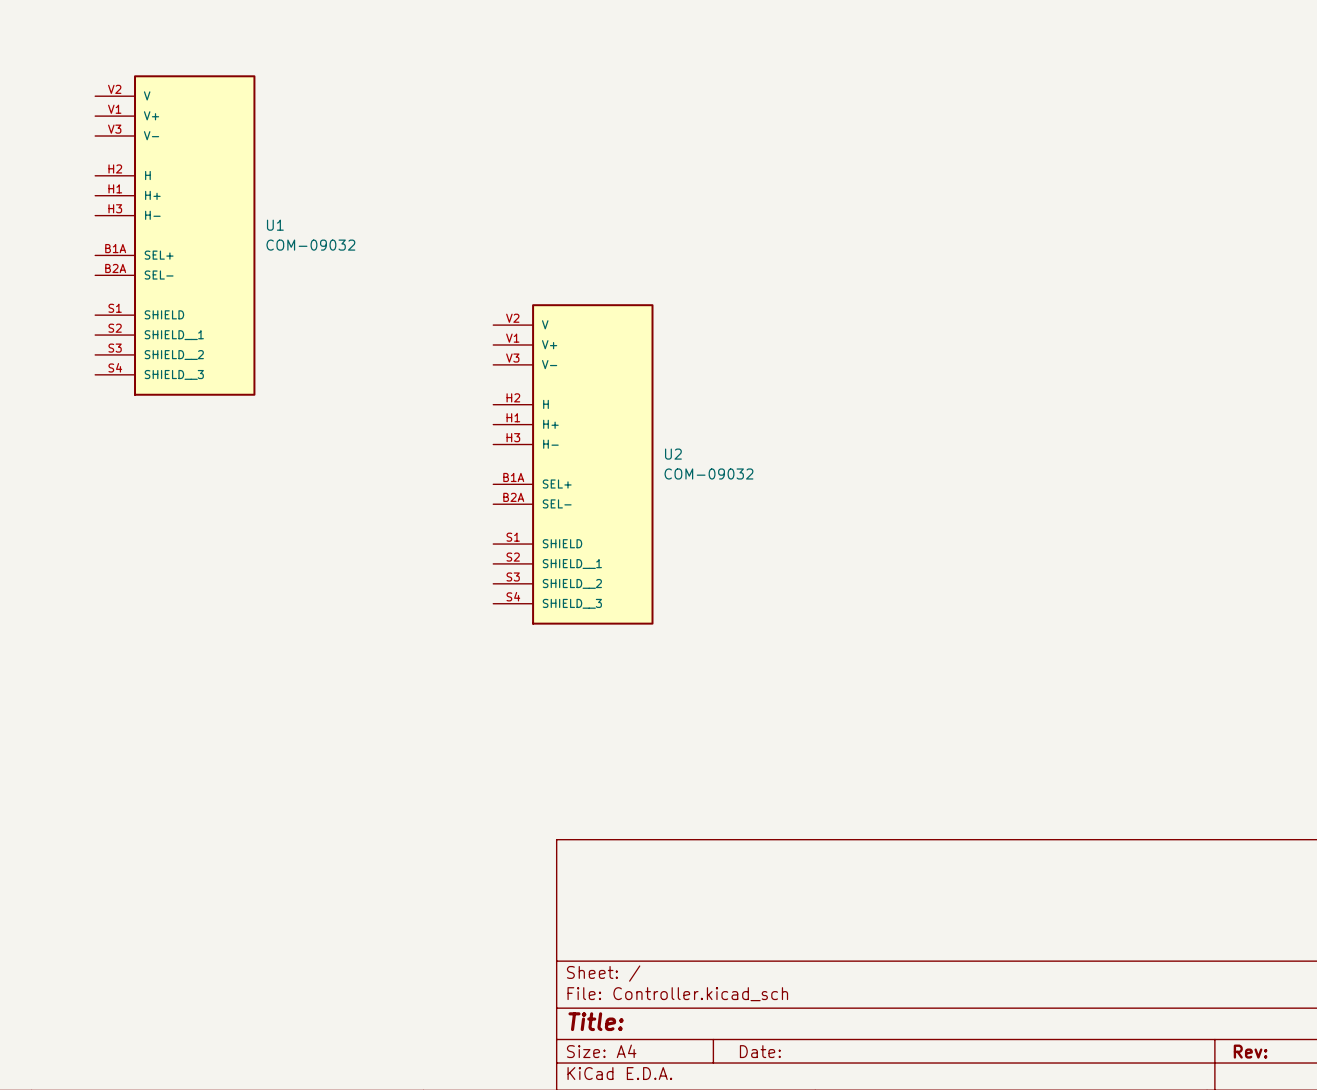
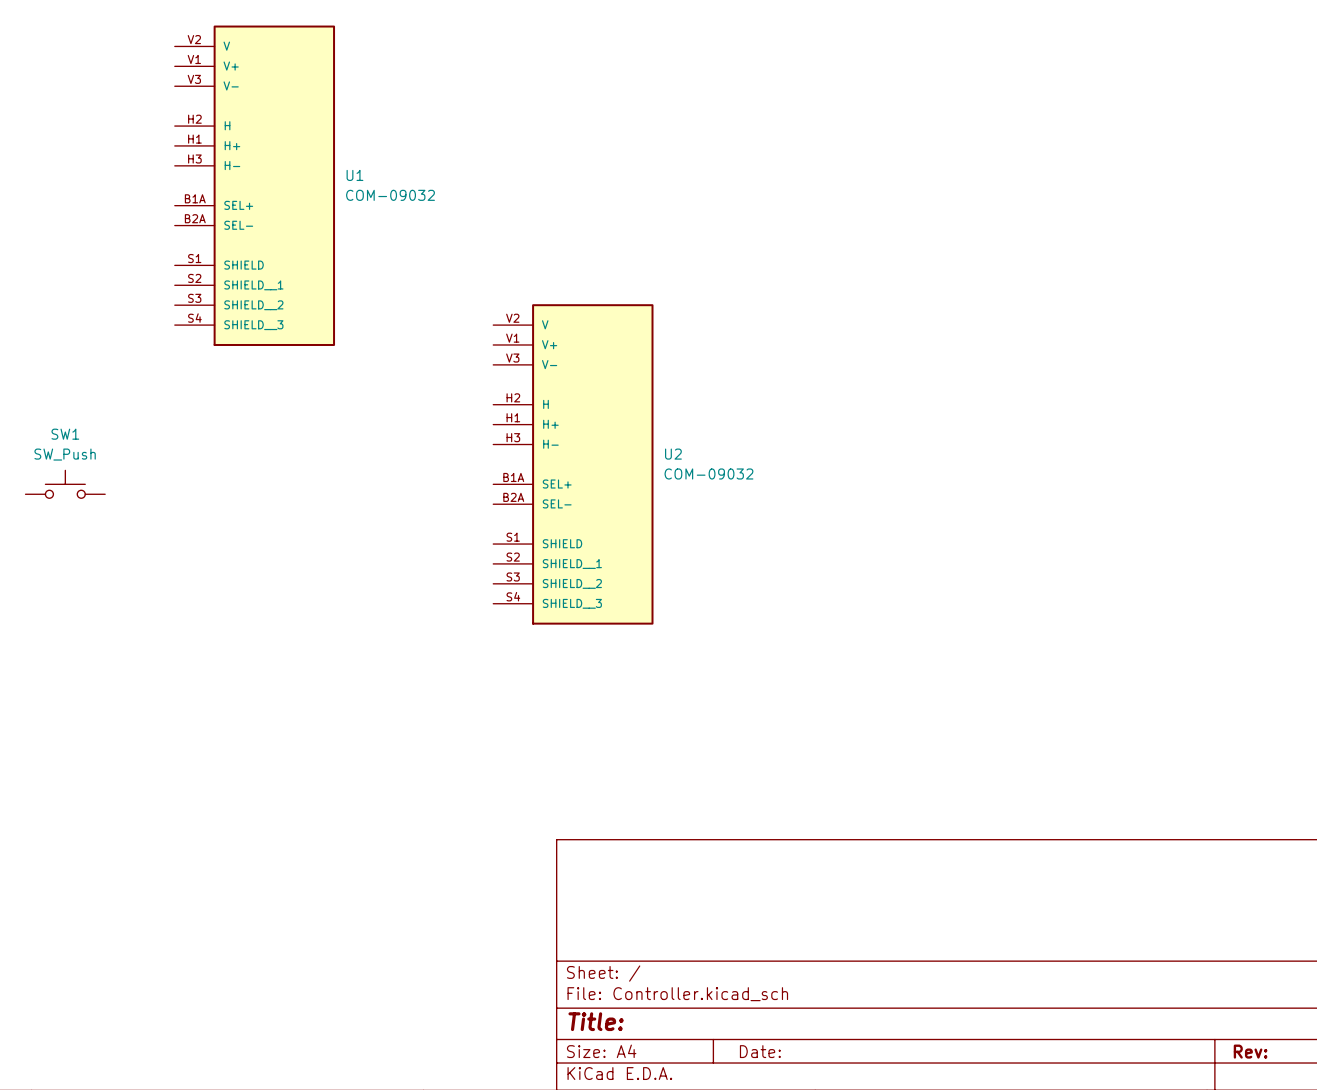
U1 position: (175, 235) -> (254, 185)
SW1: none -> SW_Push (65, 484)

